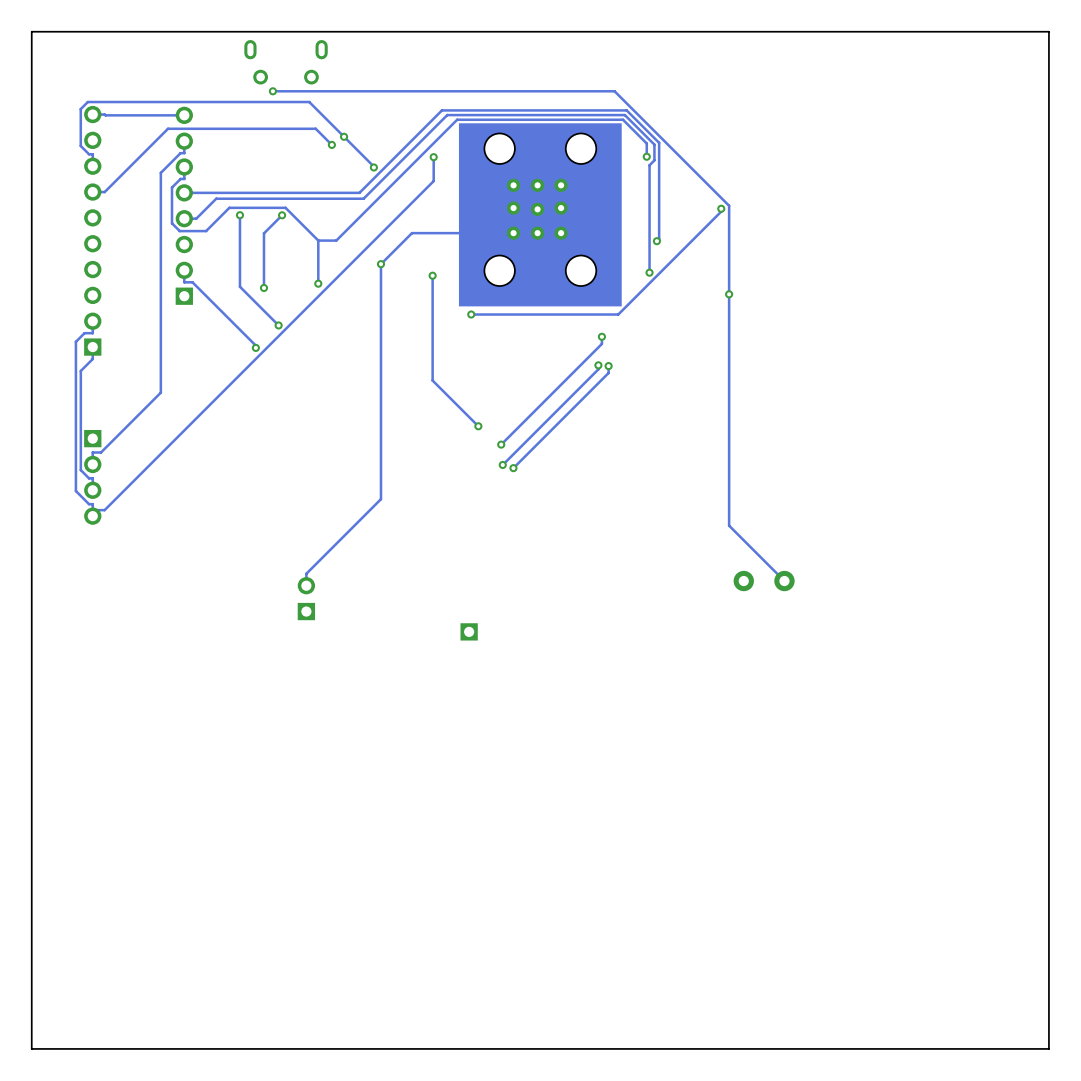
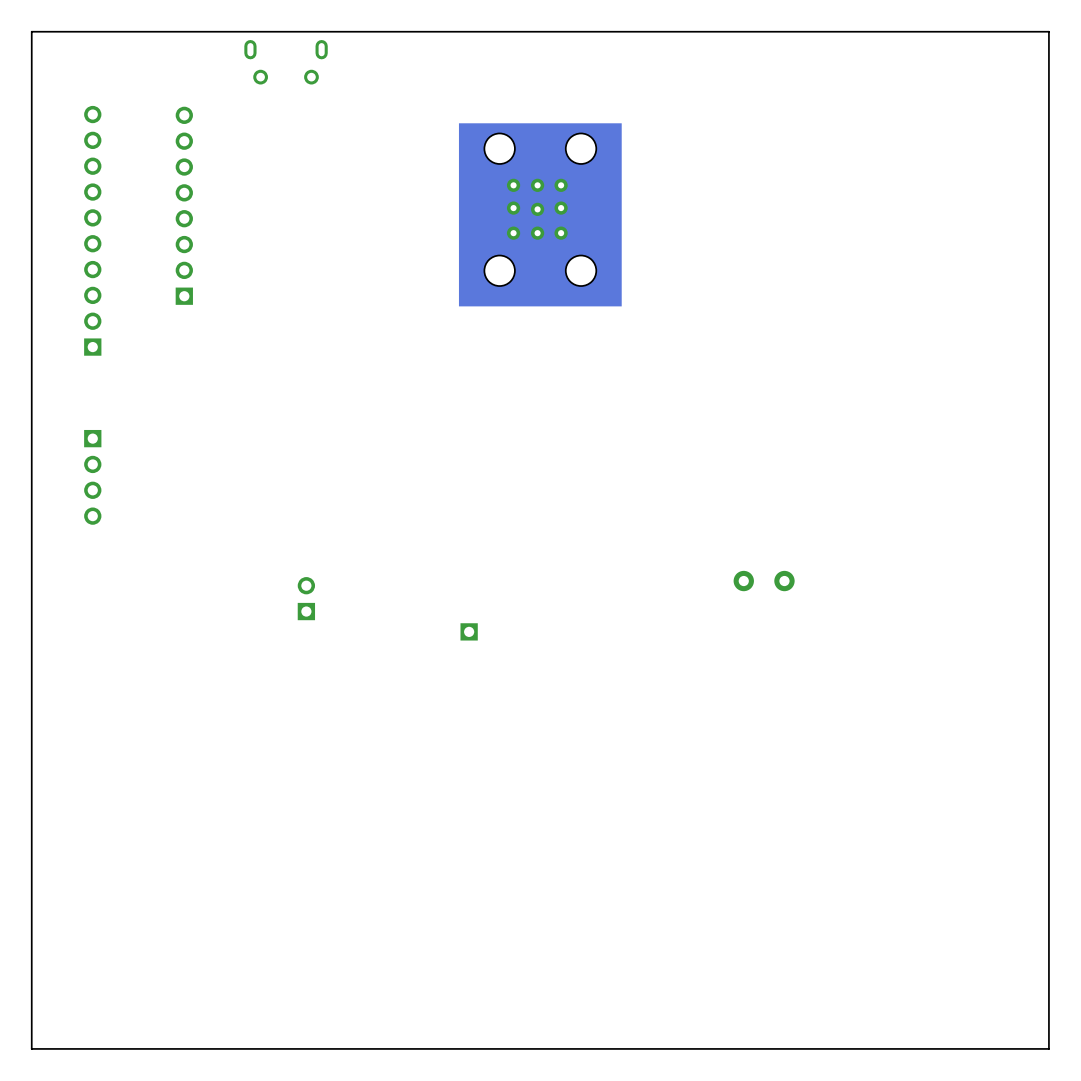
track: (272, 91) (614, 91) (729, 205) (729, 525) (784, 581) -> none
via: (272, 91) -> none
track: (92, 114) (184, 115) -> none
via: (344, 136) -> none
track: (184, 141) (184, 153) (180, 153) (160, 172) (160, 392) (100, 452) (92, 452) (92, 464) -> none
track: (331, 144) (315, 128) (167, 128) (104, 192) (92, 192) -> none
via: (331, 144) -> none
track: (646, 156) (646, 143) (623, 119) (457, 119) (336, 240) (318, 240) -> none
via: (646, 156) -> none
track: (433, 157) (433, 181) (104, 510) (92, 510) -> none
via: (433, 157) -> none
track: (92, 166) (92, 154) (89, 154) (80, 145) (80, 109) (87, 102) (309, 102) (373, 167) -> none
track: (184, 167) (184, 178) (180, 178) (172, 187) (172, 223) (179, 231) (206, 231) (229, 207) (285, 207) (318, 240) -> none
via: (373, 167) -> none
track: (184, 192) (359, 192) (441, 110) (626, 110) (659, 142) (659, 238) (656, 241) -> none
track: (721, 208) (721, 211) (618, 314) (471, 314) -> none
via: (721, 208) -> none
track: (239, 215) (239, 286) (278, 325) -> none
via: (239, 215) -> none
track: (282, 215) (263, 233) (263, 288) -> none
via: (282, 215) -> none
track: (184, 218) (196, 218) (216, 198) (363, 198) (447, 115) (624, 115) (654, 144) (654, 160) (649, 165) (649, 272) -> none
track: (513, 233) (411, 233) (380, 264) (380, 499) (306, 573) (306, 585) -> none
track: (318, 240) (318, 283) -> none
via: (656, 241) -> none
via: (380, 264) -> none
track: (184, 270) (184, 282) (192, 282) (255, 345) (255, 347) -> none
via: (649, 272) -> none
track: (432, 275) (432, 380) (478, 426) -> none
via: (432, 275) -> none
via: (318, 283) -> none
via: (263, 288) -> none
via: (729, 294) -> none
via: (471, 314) -> none
track: (92, 321) (92, 333) (84, 333) (75, 341) (75, 491) (89, 504) (92, 504) (92, 516) -> none
via: (278, 325) -> none
track: (601, 336) (601, 343) (501, 444) -> none
via: (601, 336) -> none
track: (92, 347) (92, 359) (80, 370) (80, 470) (89, 478) (92, 478) (92, 490) -> none
via: (255, 347) -> none
track: (598, 365) (598, 369) (502, 464) -> none
via: (598, 365) -> none
track: (608, 366) (608, 372) (513, 468) -> none
via: (608, 366) -> none
via: (478, 426) -> none
via: (501, 444) -> none
via: (502, 464) -> none
via: (513, 468) -> none

